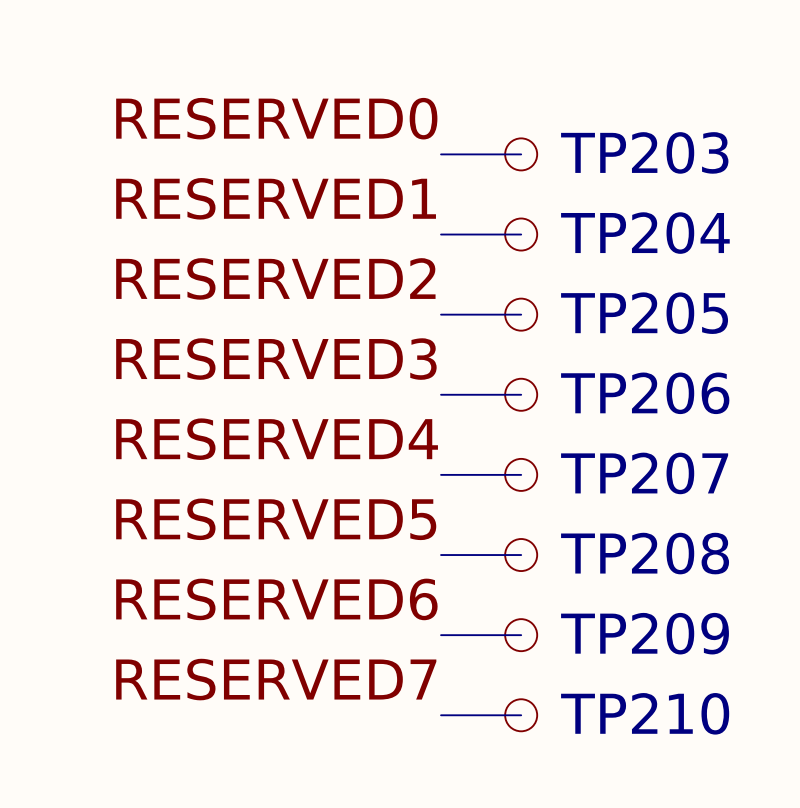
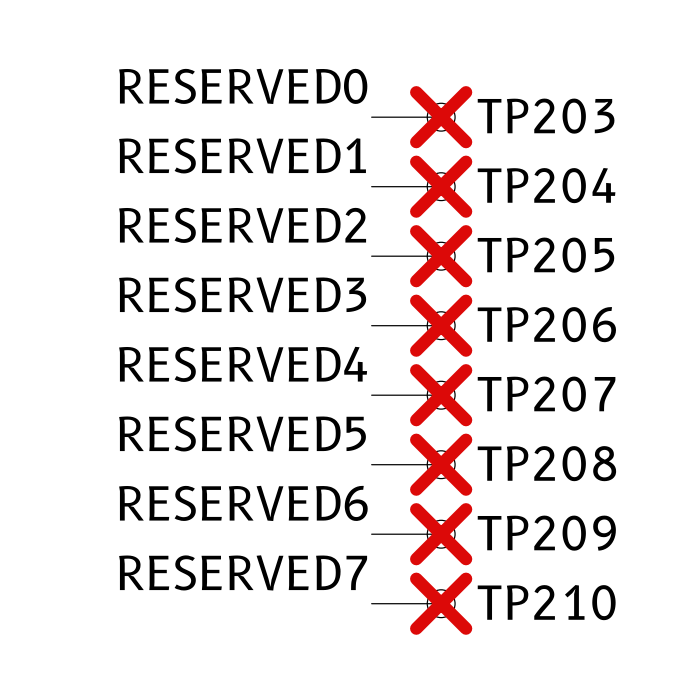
TP203 do-not-place cross: none -> (441, 117)
TP204 do-not-place cross: none -> (441, 186)
TP205 do-not-place cross: none -> (441, 256)
TP206 do-not-place cross: none -> (441, 325)
TP207 do-not-place cross: none -> (441, 395)
TP208 do-not-place cross: none -> (441, 464)
TP209 do-not-place cross: none -> (441, 534)
TP210 do-not-place cross: none -> (441, 603)

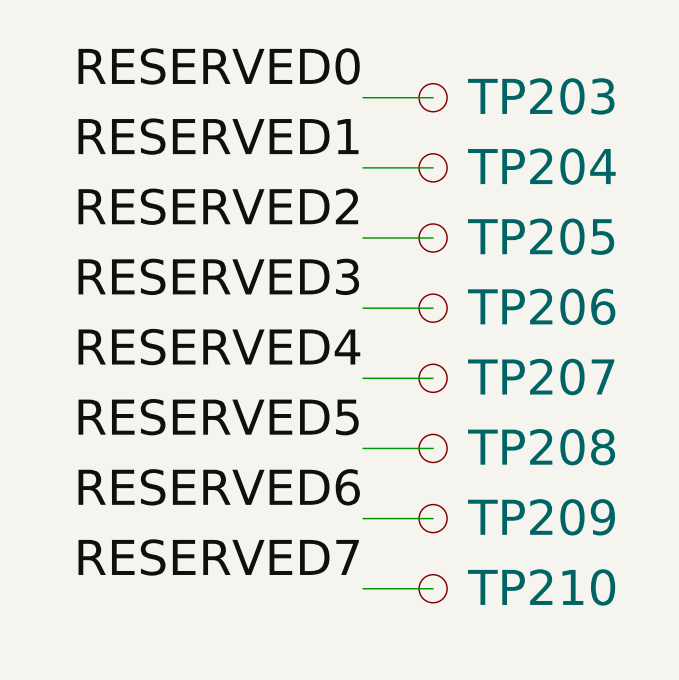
TP203 do-not-place cross: (441, 117) -> none
TP204 do-not-place cross: (441, 186) -> none
TP205 do-not-place cross: (441, 256) -> none
TP206 do-not-place cross: (441, 325) -> none
TP207 do-not-place cross: (441, 395) -> none
TP208 do-not-place cross: (441, 464) -> none
TP209 do-not-place cross: (441, 534) -> none
TP210 do-not-place cross: (441, 603) -> none

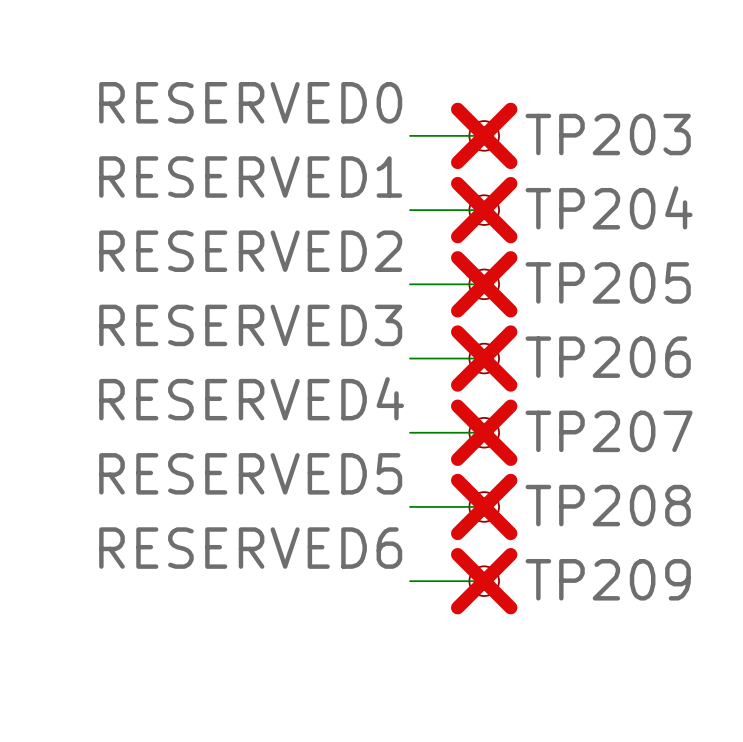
TP203 do-not-place cross: none -> (484, 135)
TP204 do-not-place cross: none -> (484, 210)
TP205 do-not-place cross: none -> (484, 284)
TP206 do-not-place cross: none -> (484, 358)
TP207 do-not-place cross: none -> (484, 432)
TP208 do-not-place cross: none -> (484, 506)
TP209 do-not-place cross: none -> (484, 581)
label: RESERVED7 (218, 557) -> none
wire: (362, 588) (433, 588) -> none
TP210: (433, 588) -> none

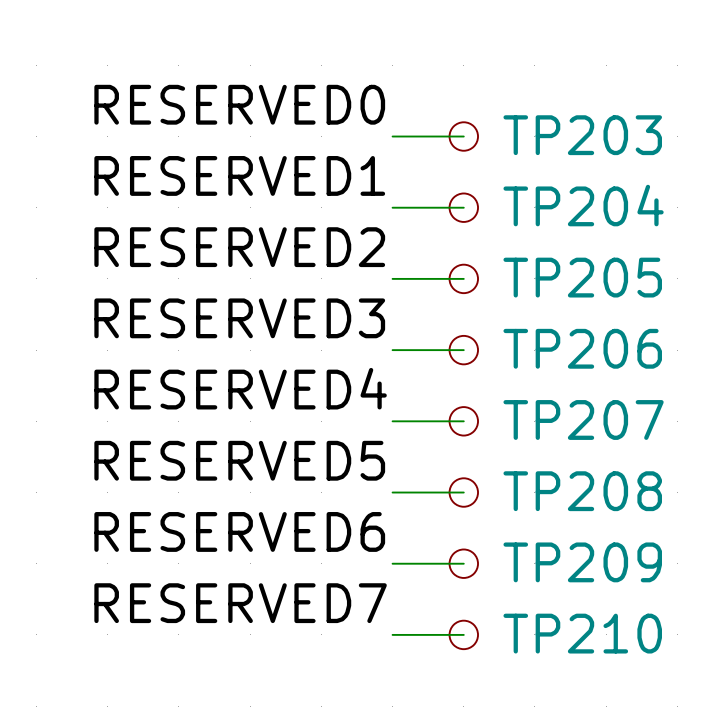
TP203 do-not-place cross: (484, 135) -> none
TP204 do-not-place cross: (484, 210) -> none
TP205 do-not-place cross: (484, 284) -> none
TP206 do-not-place cross: (484, 358) -> none
TP207 do-not-place cross: (484, 432) -> none
TP208 do-not-place cross: (484, 506) -> none
TP209 do-not-place cross: (484, 581) -> none
label: none -> RESERVED7 (240, 603)
wire: none -> (392, 634) (463, 634)
TP210: none -> (463, 634)

